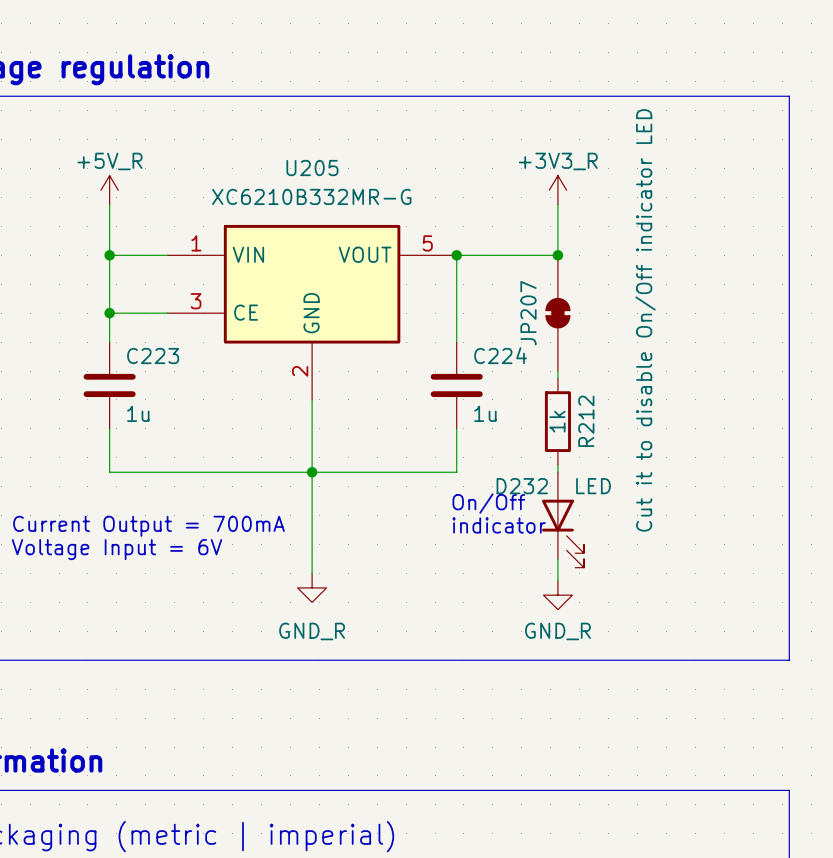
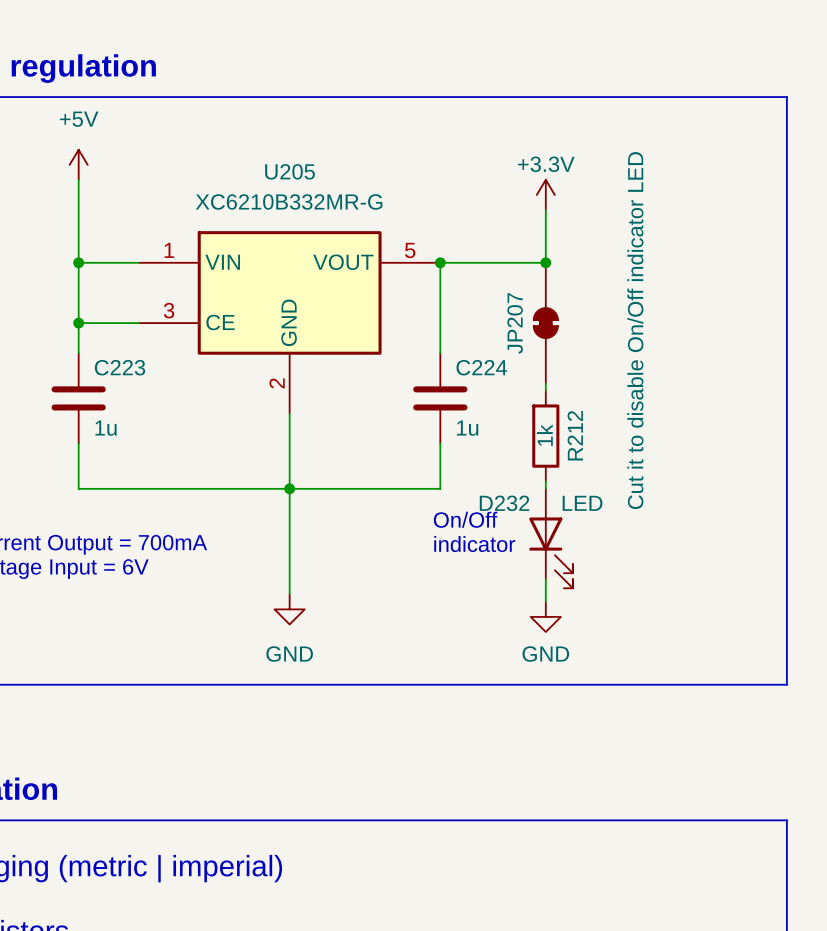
power symbol: none -> +5V (78, 164)
power symbol: +5V_R (109, 190) -> none
power symbol: +3V3_R (557, 190) -> +3.3V (545, 195)
power symbol: GND_R (312, 587) -> GND (289, 609)
power symbol: GND_R (557, 595) -> GND (545, 616)

